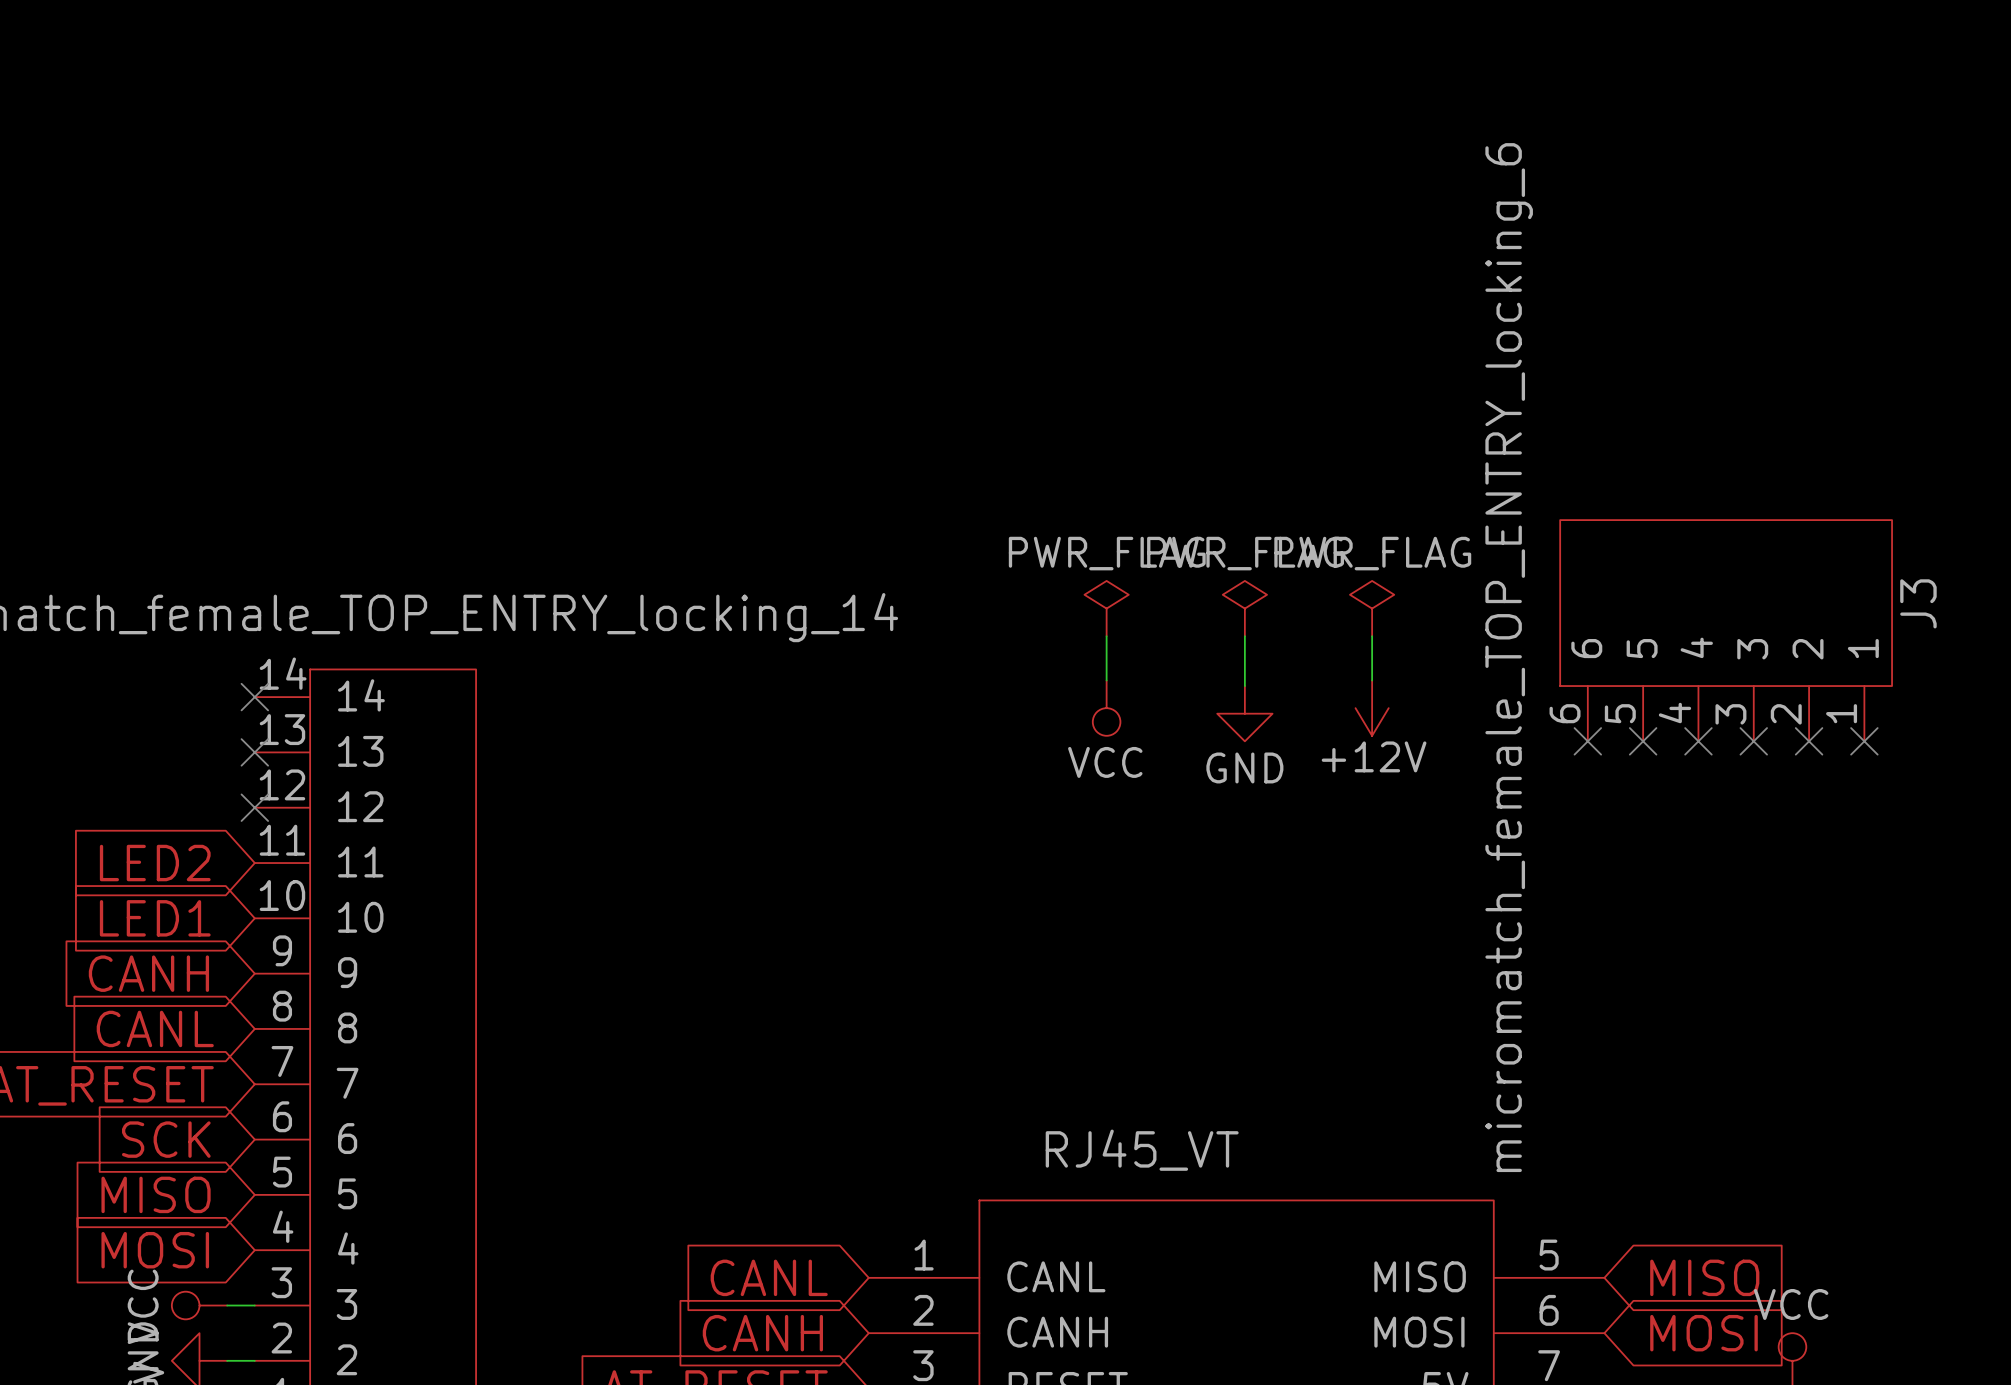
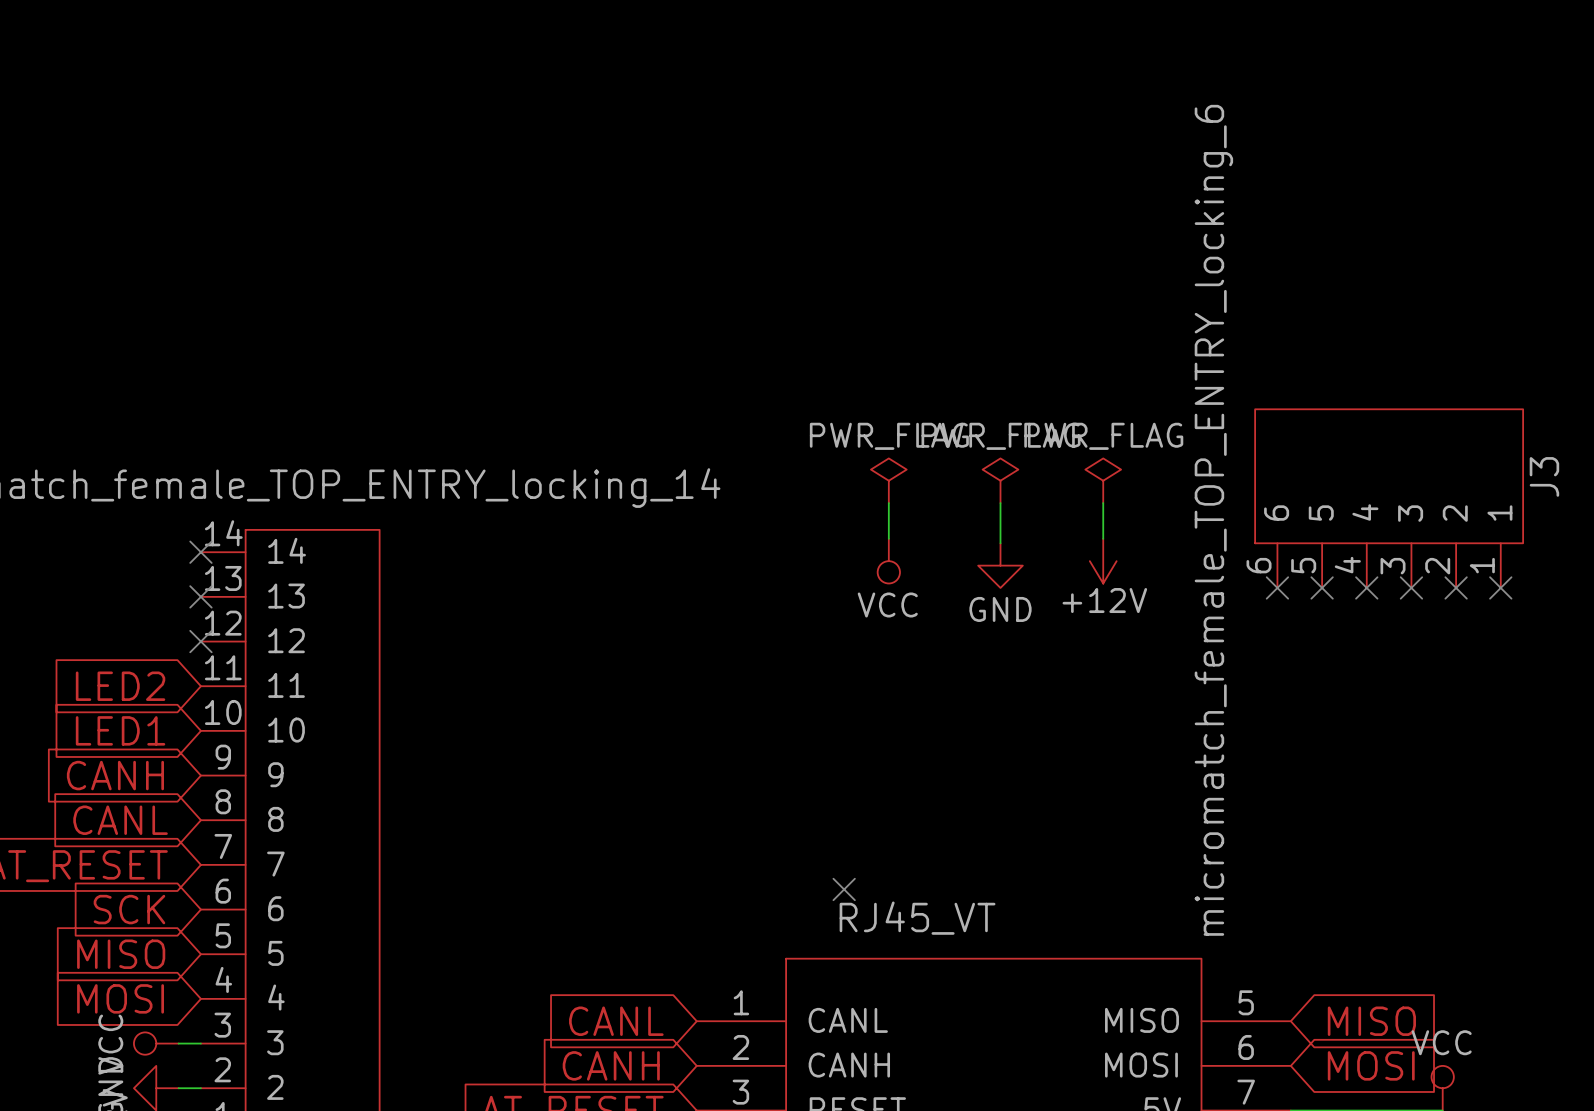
no-connect mark: none -> (844, 889)

